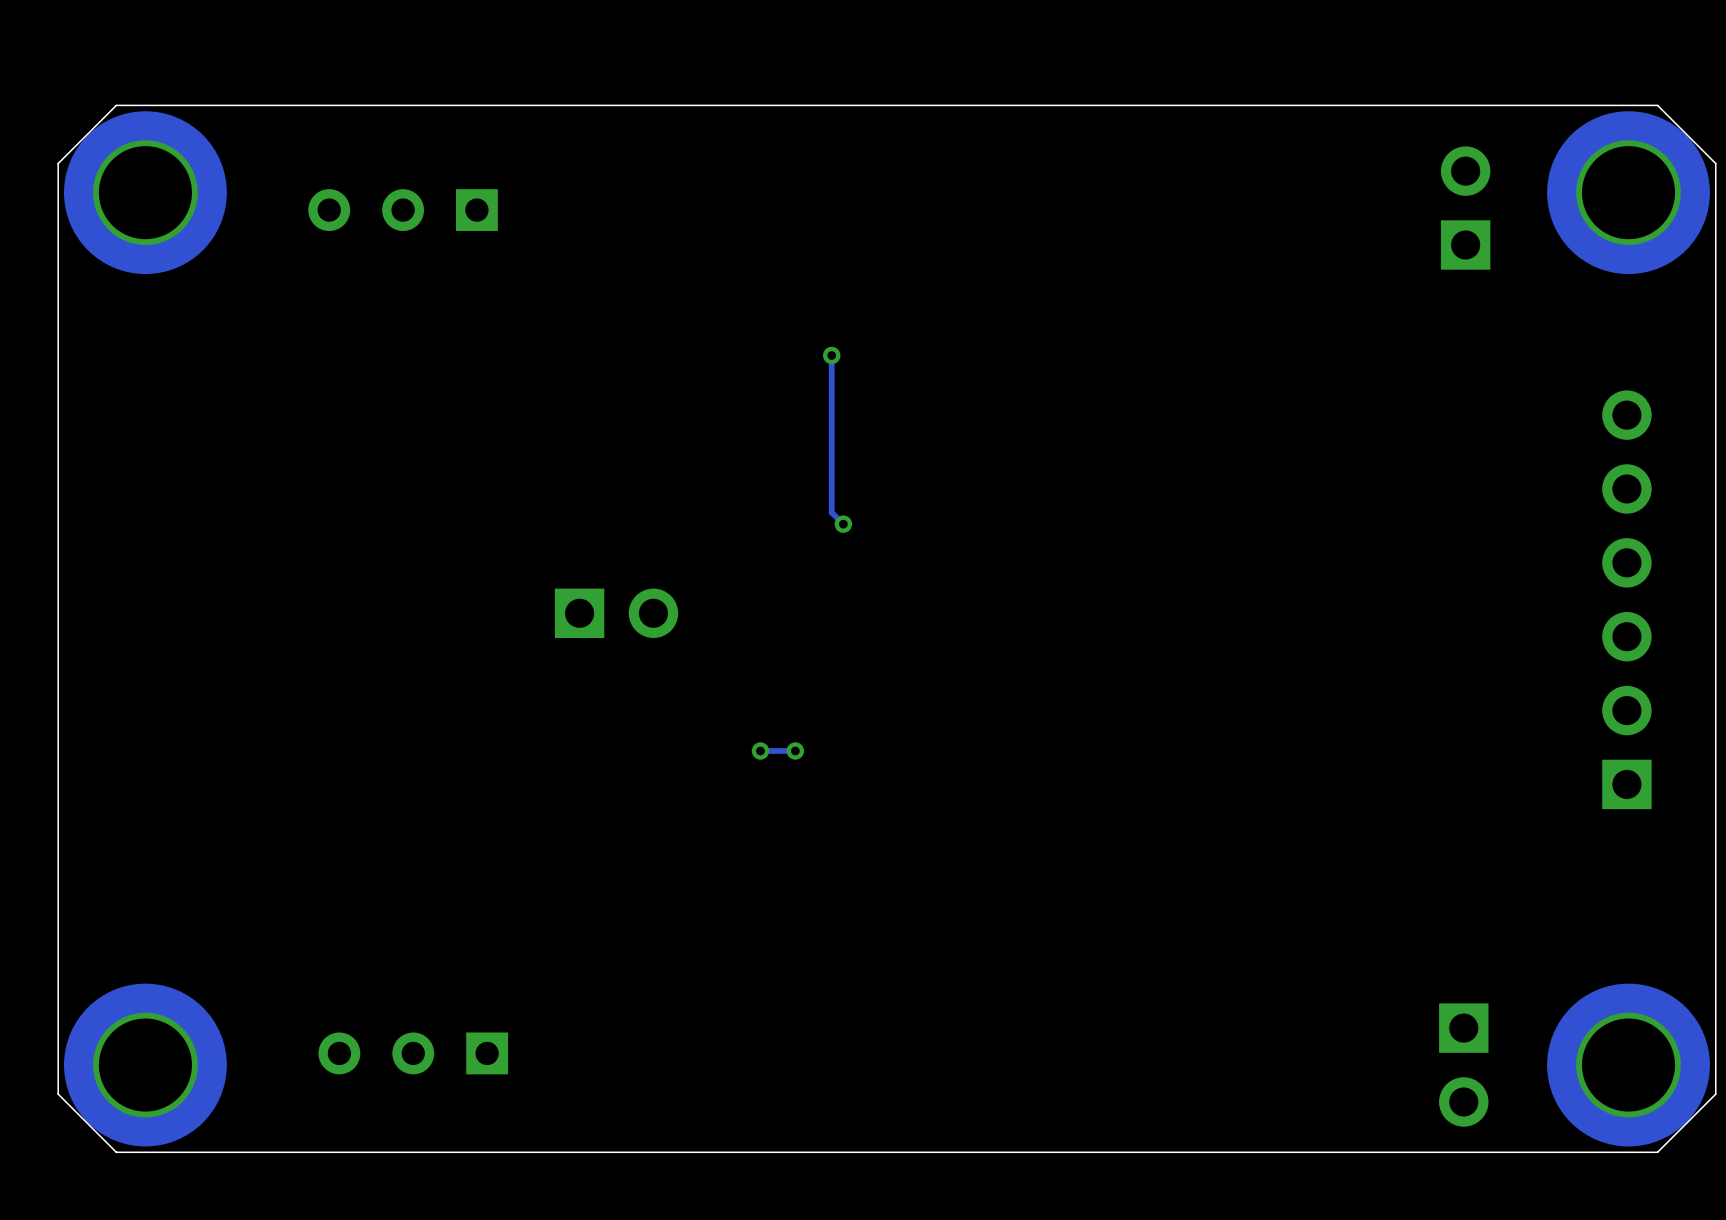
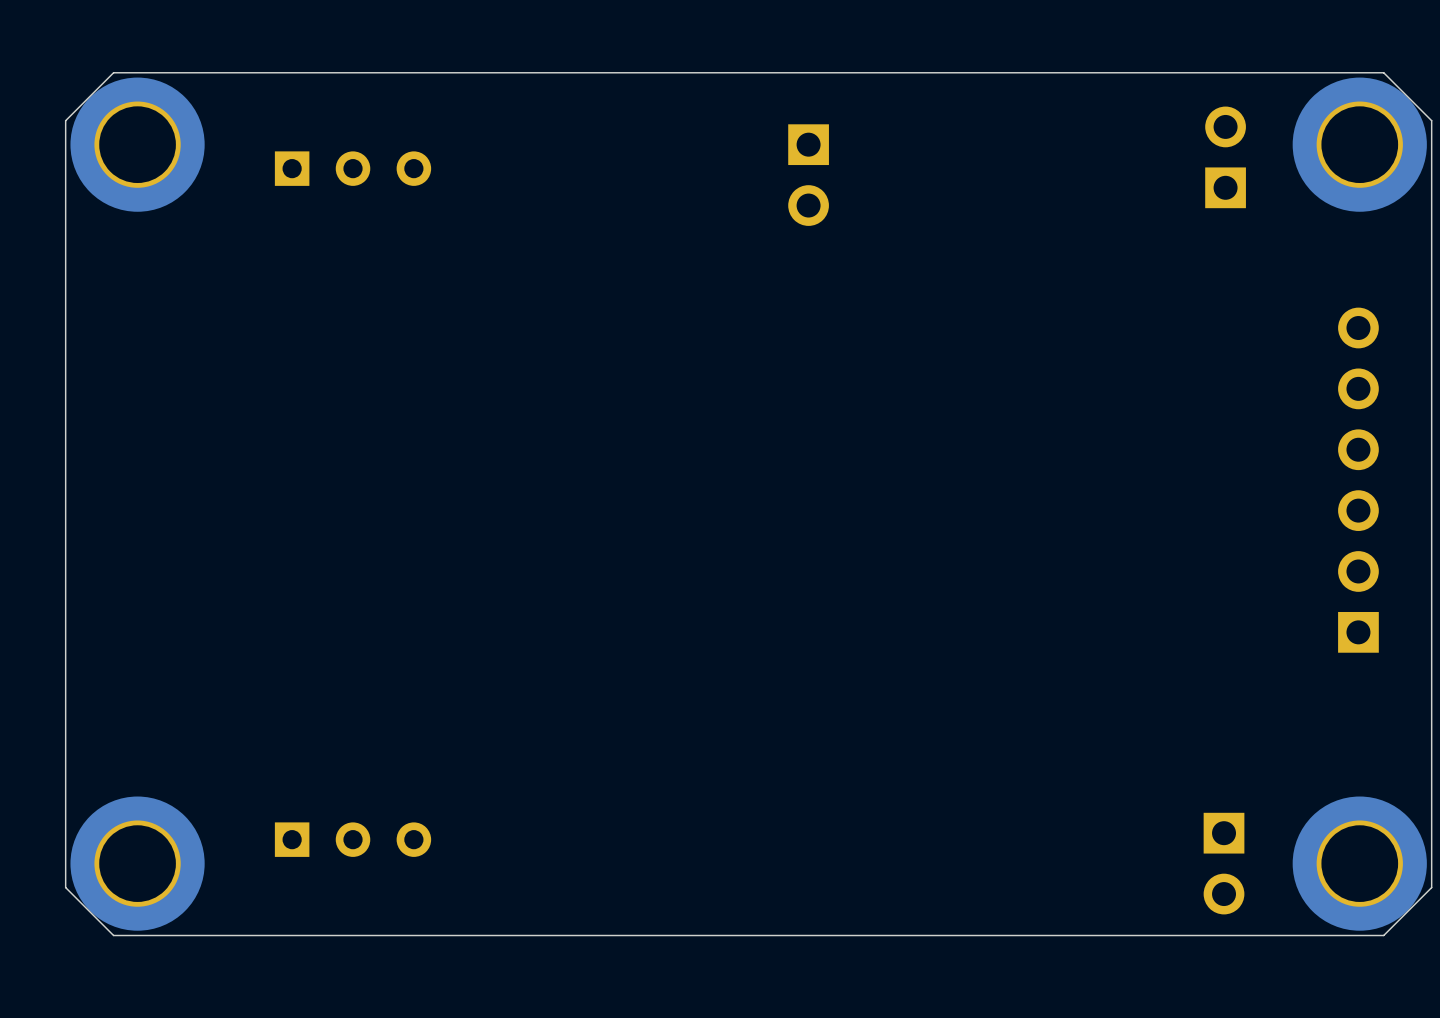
part rotation: 0° (403, 210) -> 180° (353, 168)
track: (831, 355) (831, 512) (843, 524) -> none
via: (831, 355) -> none
via: (843, 524) -> none
part rotation: 0° (616, 613) -> 90° clockwise (808, 175)
part position: (616, 613) -> (808, 175)
via: (760, 750) -> none
track: (795, 750) (760, 750) -> none
via: (795, 750) -> none
part rotation: 0° (413, 1053) -> 180° (353, 839)

